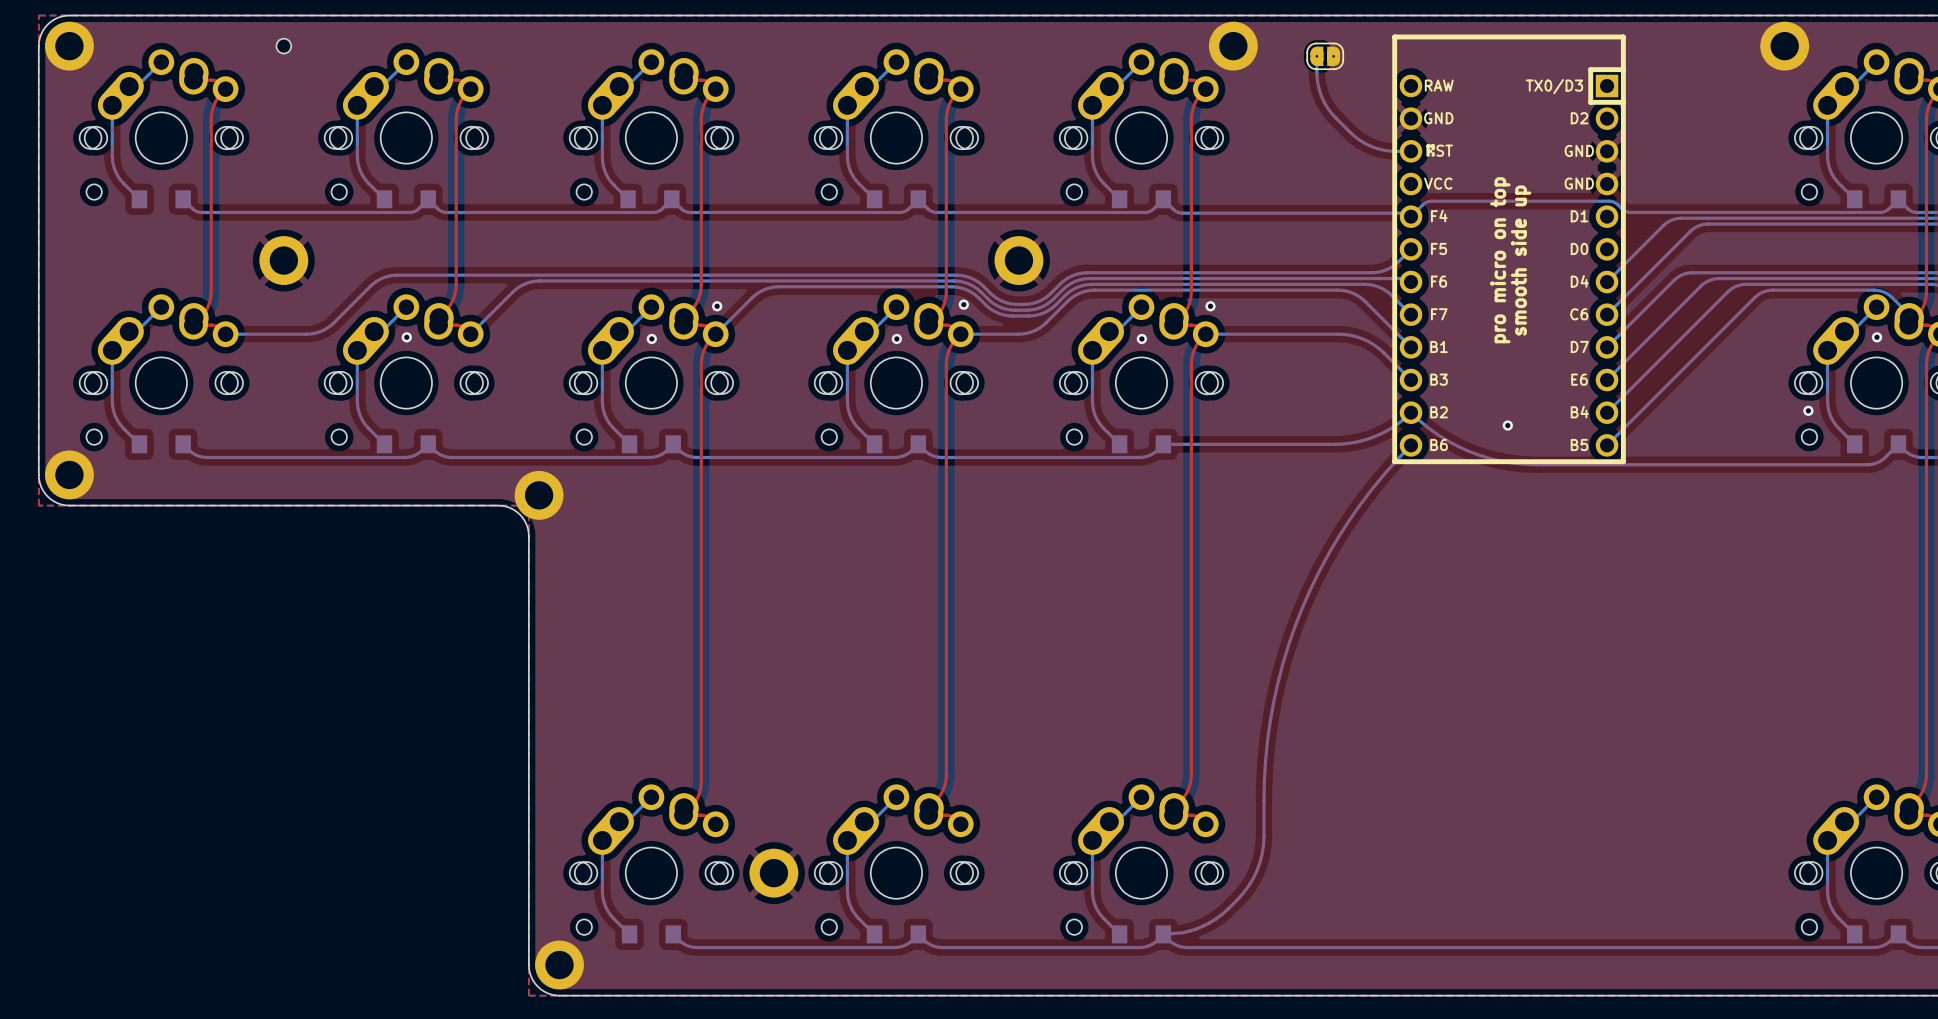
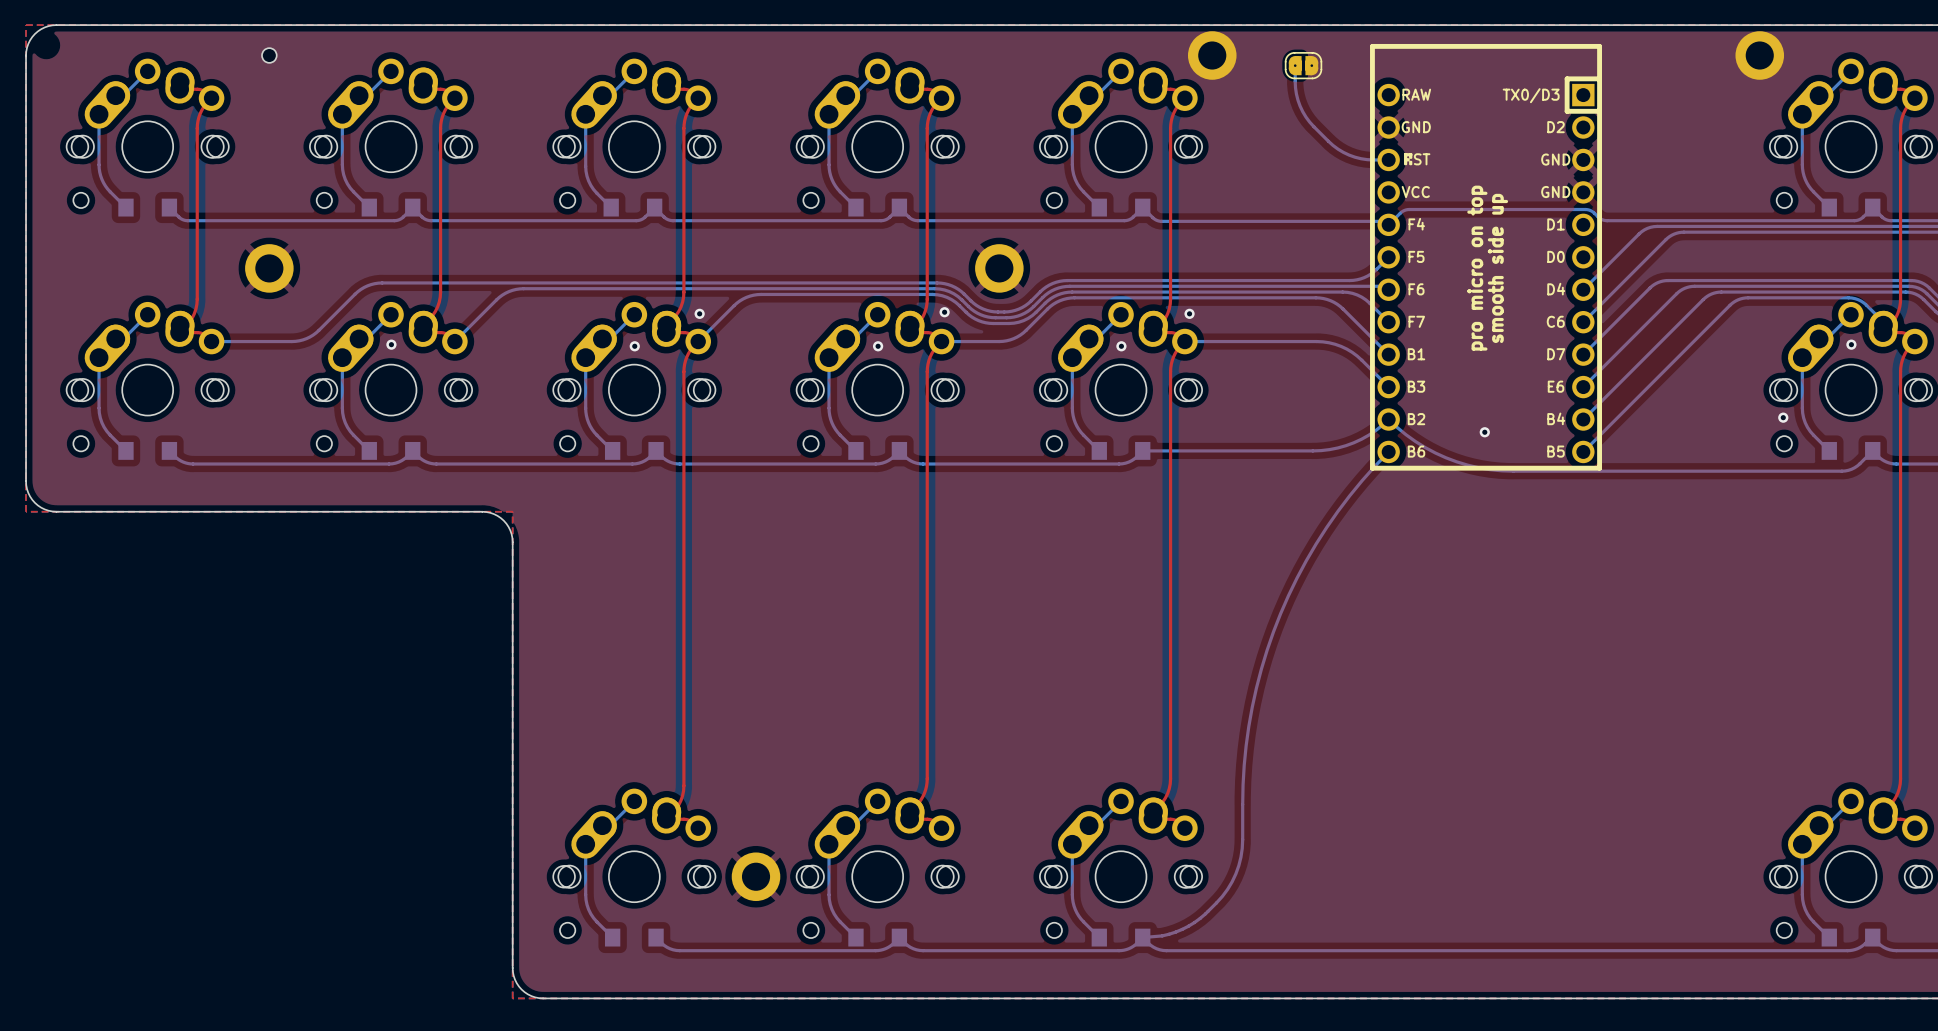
part: (69, 46) -> none
part: (69, 474) -> none
part: (539, 495) -> none
part: (559, 965) -> none

